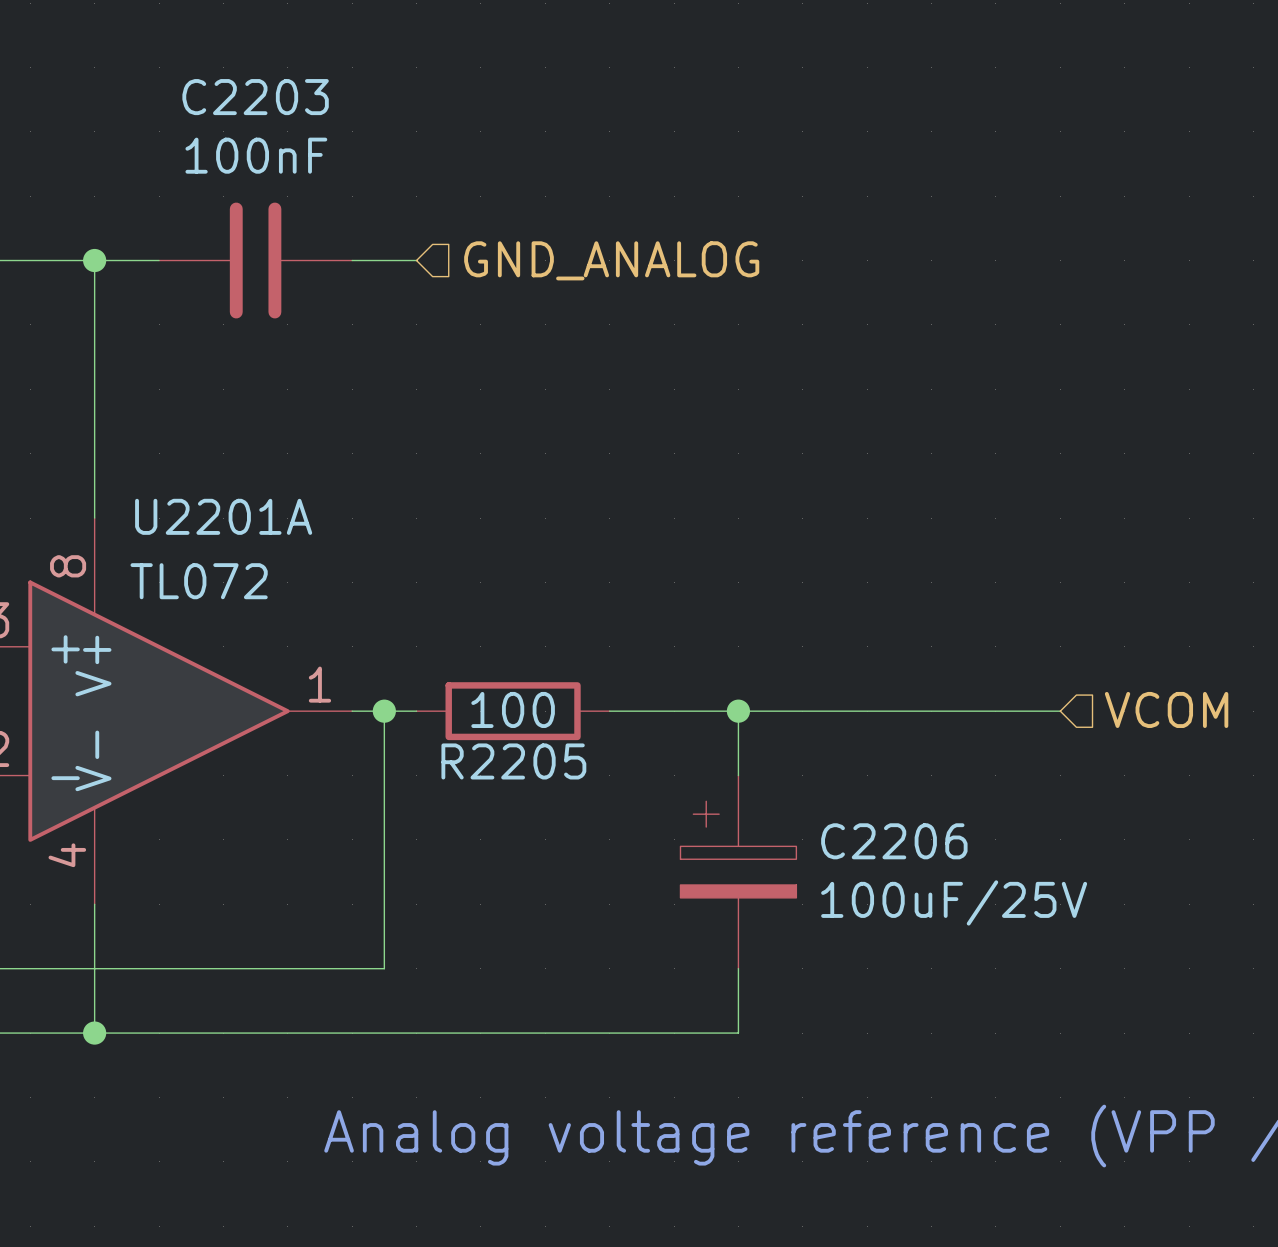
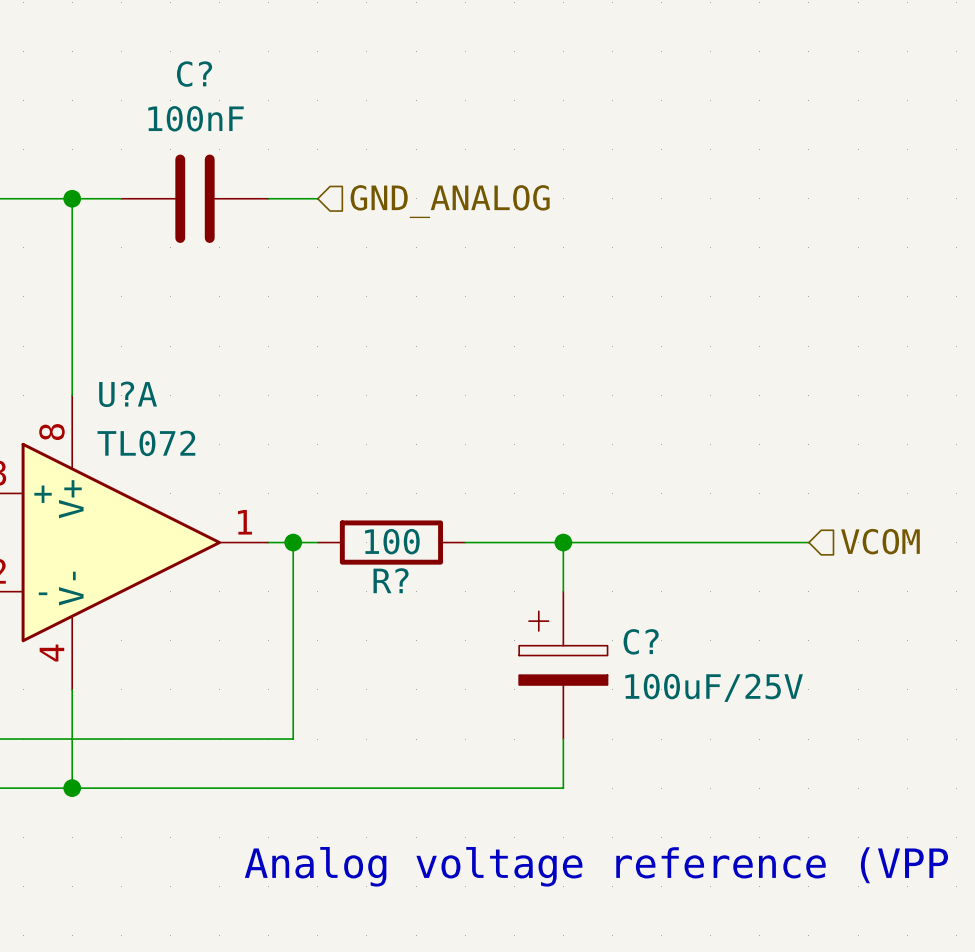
C2203 name: C2203 (255, 97) -> C? (194, 74)
U2201A name: U2201A (223, 516) -> U?A (128, 394)
R2205 name: R2205 (513, 761) -> R? (391, 580)
C2206 name: C2206 (894, 841) -> C? (641, 641)

